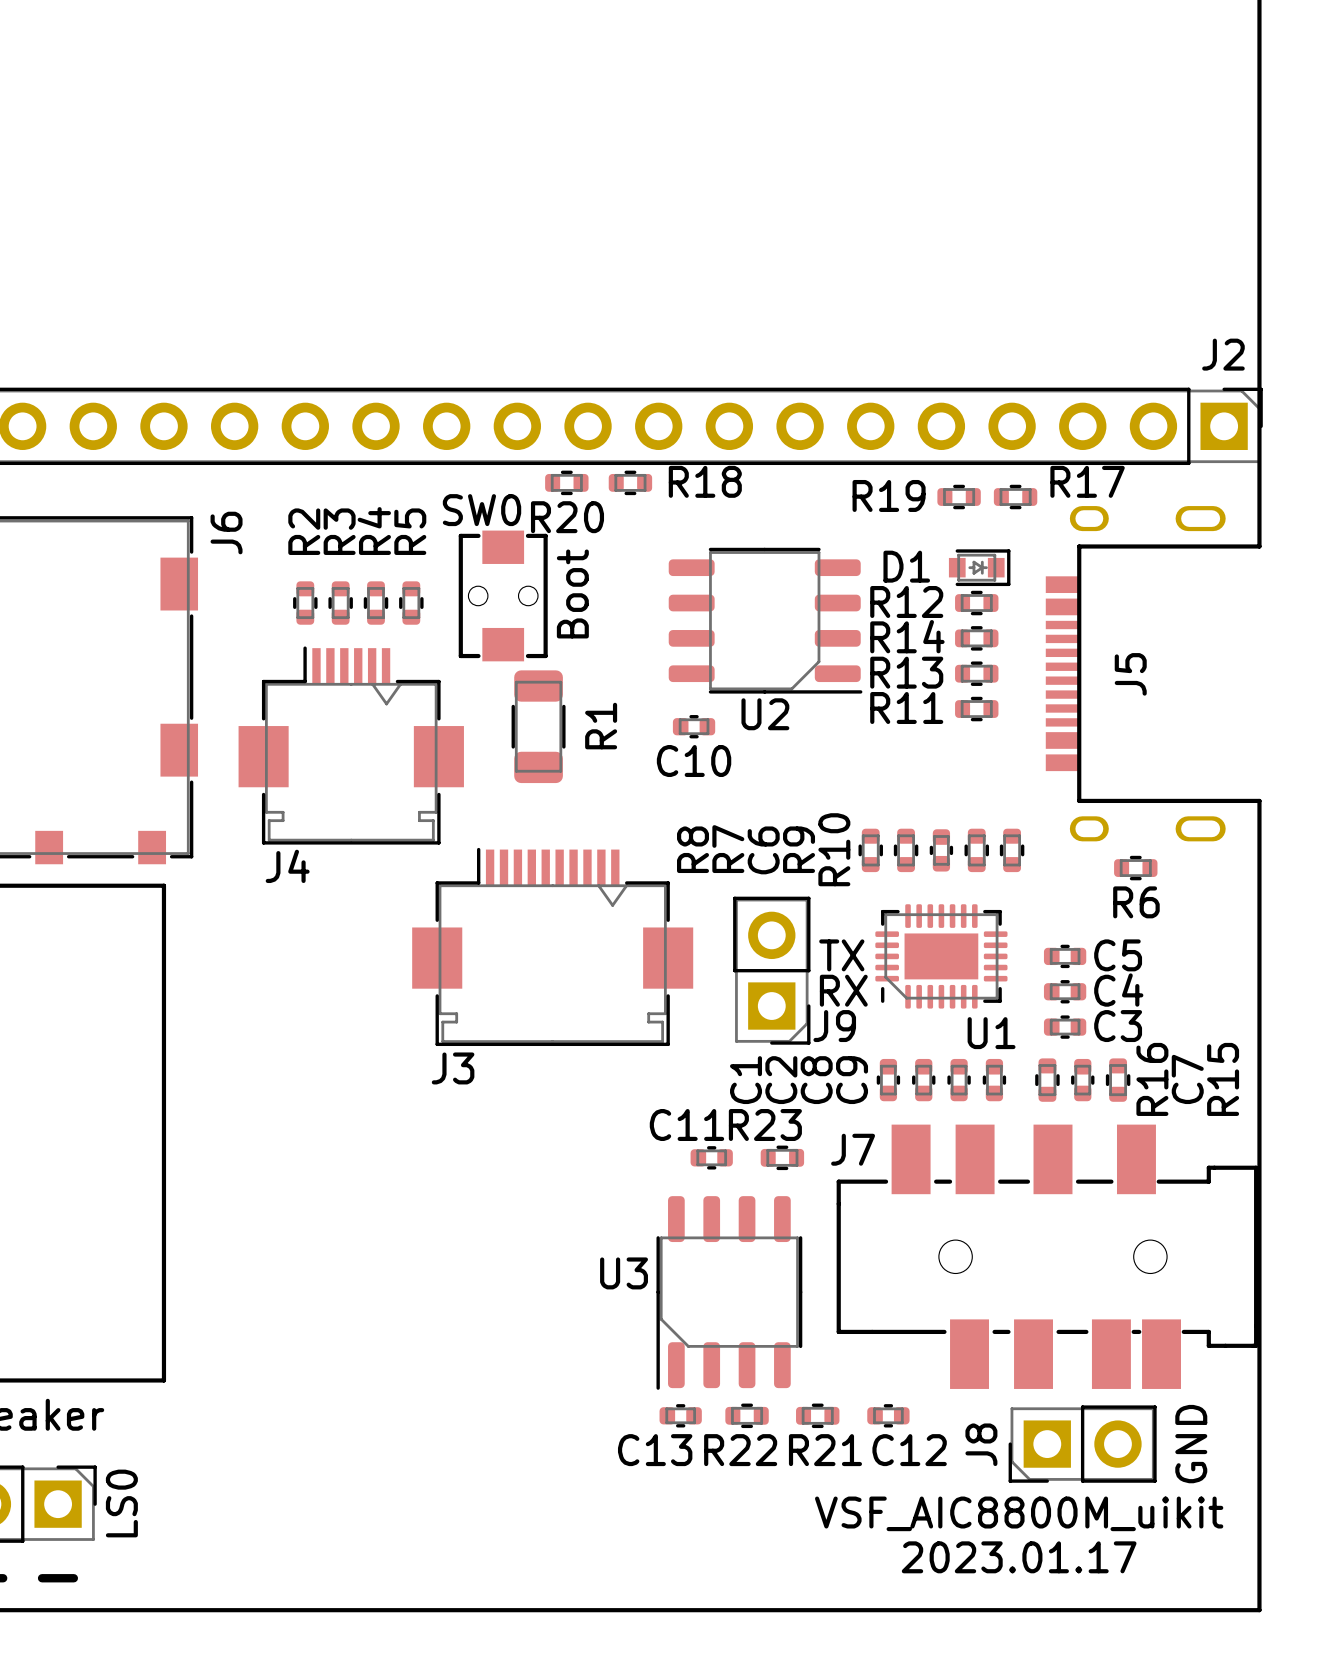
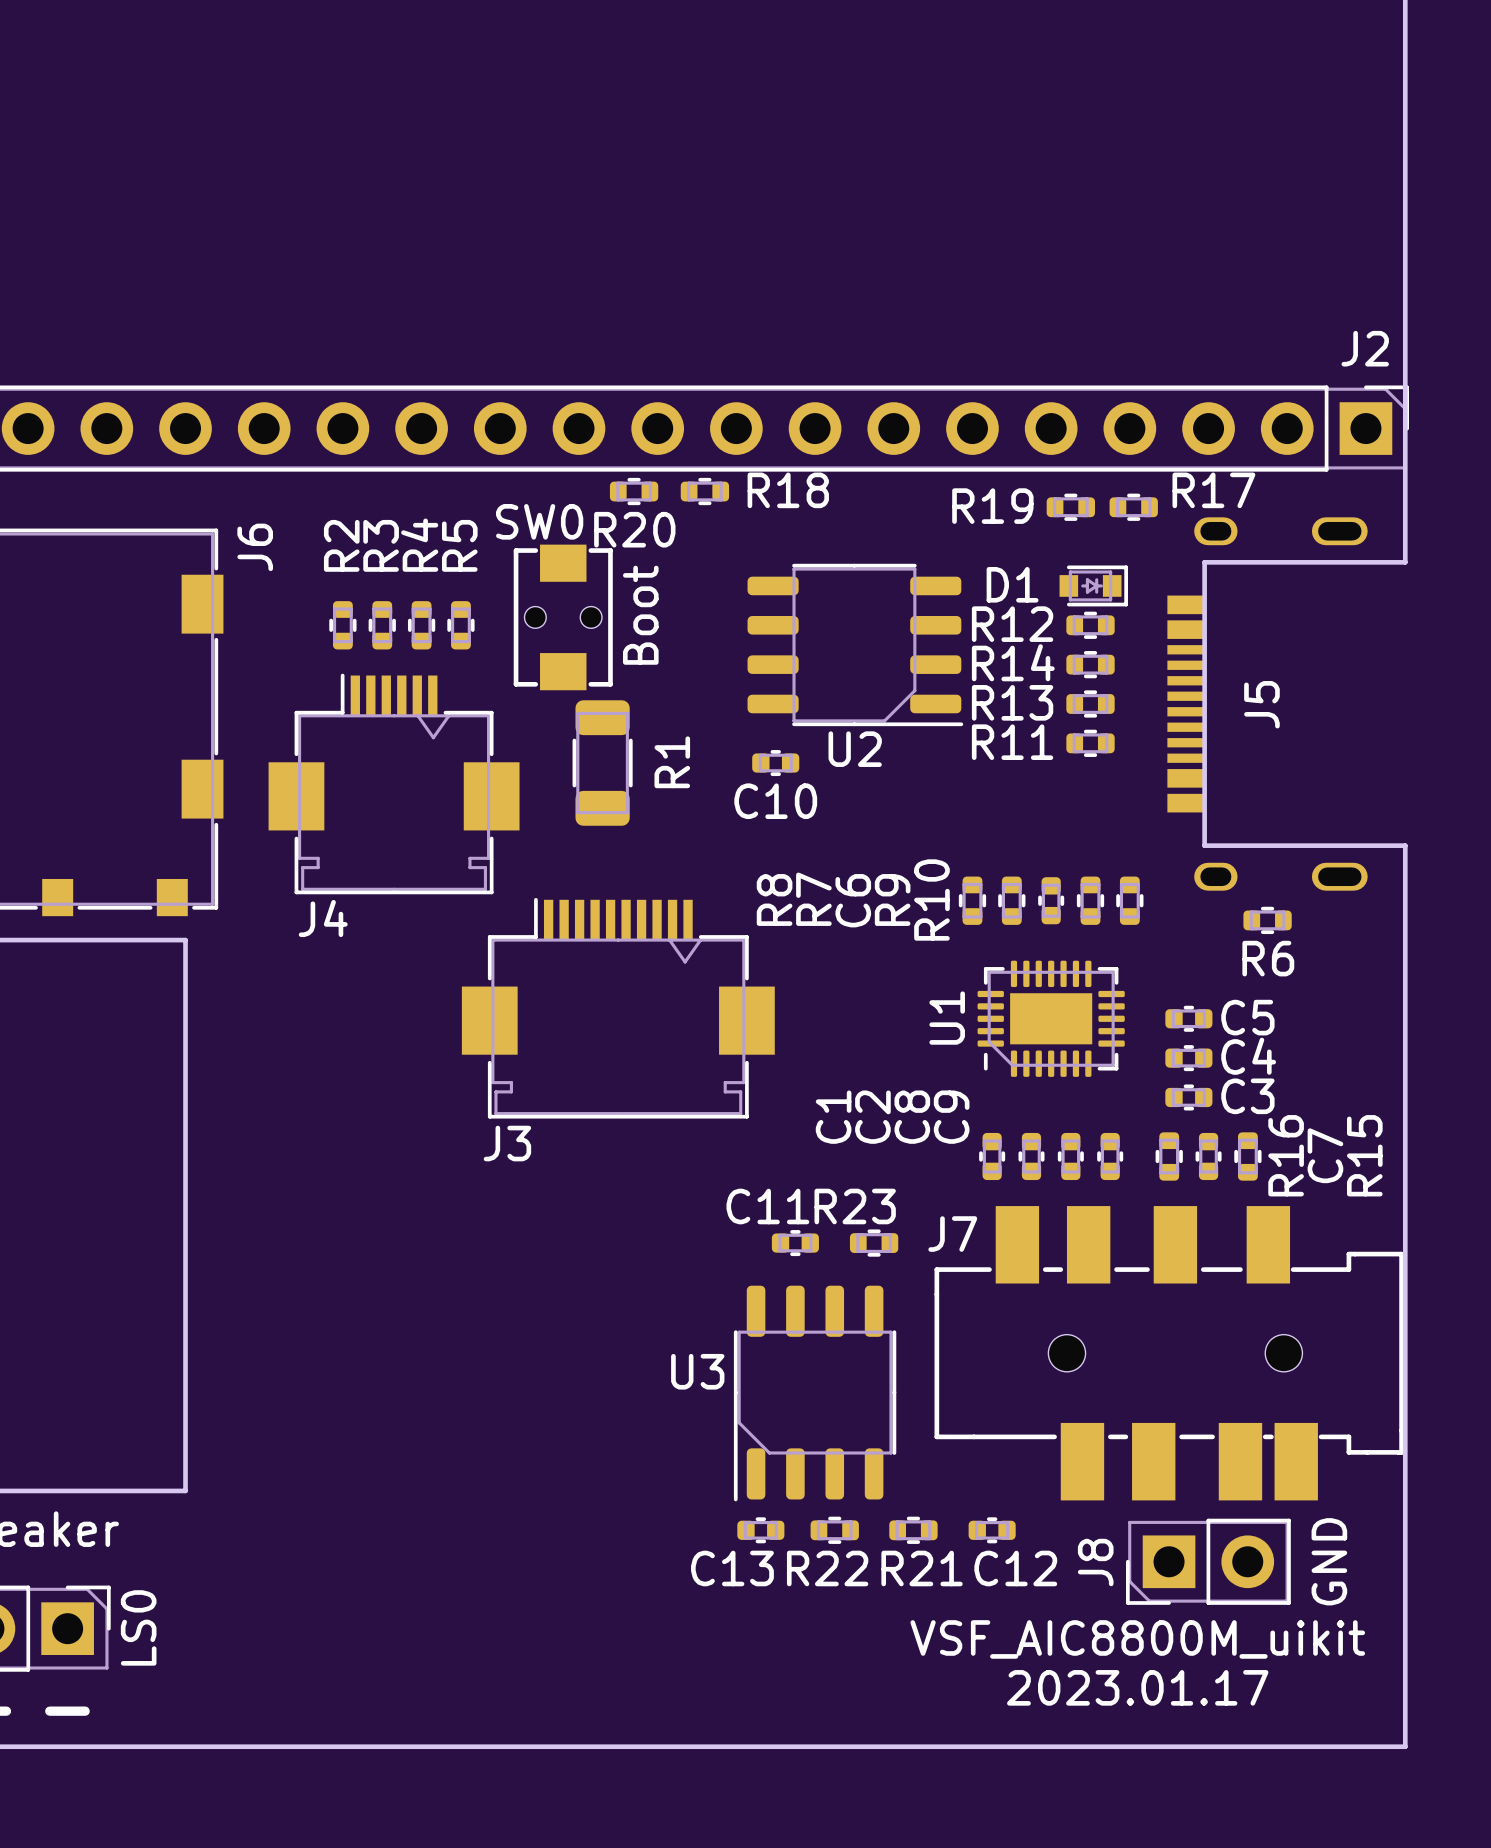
text: TX (841, 955) -> none
J9: (771, 970) -> none
text: RX (843, 990) -> none
U1 name rotation: 0° (991, 1033) -> 90° counterclockwise (947, 1018)
U1 name position: U1 (991, 1033) -> U1 (947, 1018)
C1 name position: C1 (746, 1080) -> C1 (833, 1117)
C2 name position: C2 (781, 1080) -> C2 (872, 1117)
C8 name position: C8 (816, 1080) -> C8 (912, 1117)
C9 name position: C9 (852, 1080) -> C9 (951, 1117)

